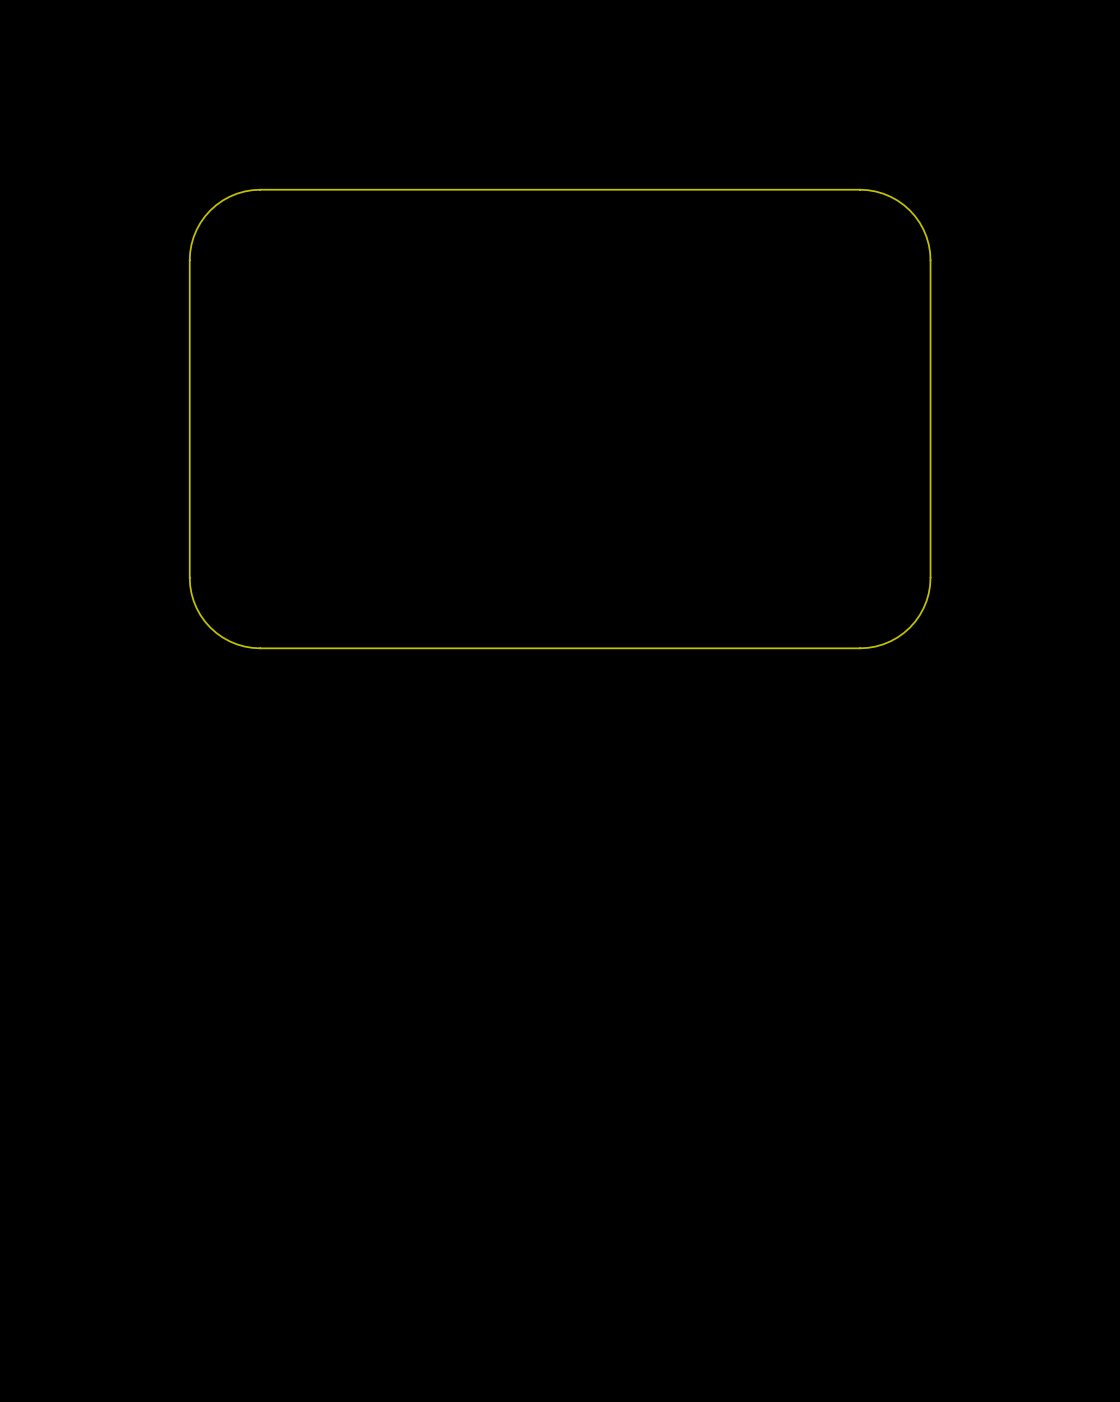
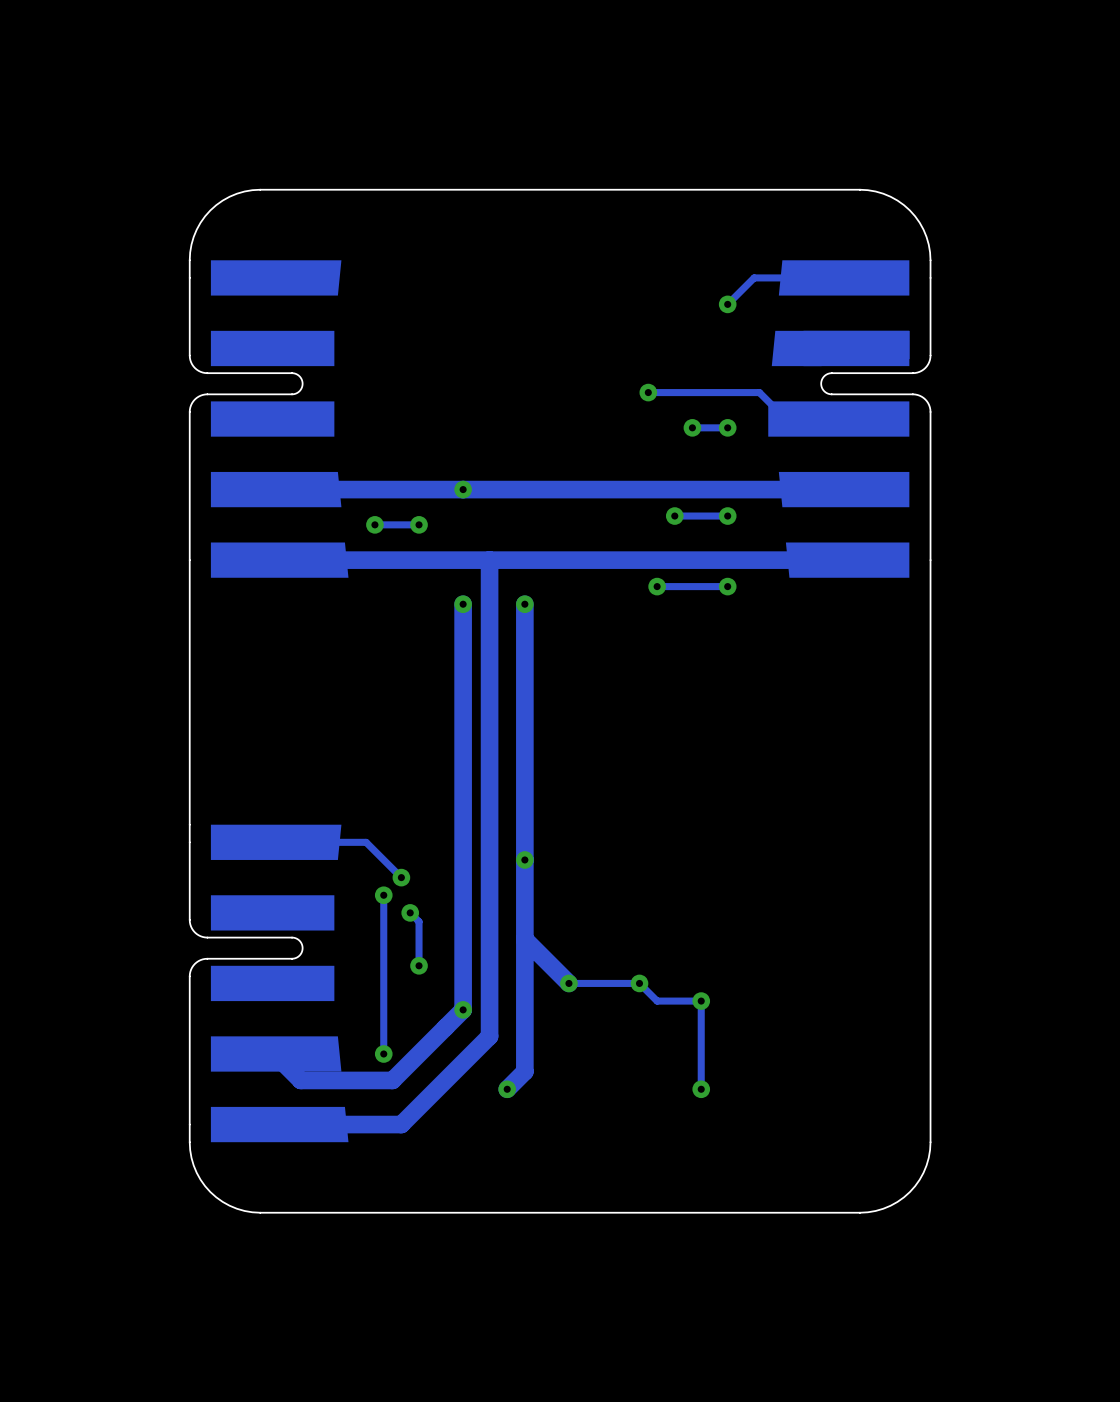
board edge: (189, 277) (189, 560) -> none
track: none -> (845, 277) (754, 277) (727, 304)
board edge: (930, 277) (930, 560) -> none
via: none -> (727, 304)
track: none -> (648, 392) (759, 392) (785, 419) (838, 419)
via: none -> (648, 392)
part: none -> (268, 419)
part: none -> (849, 419)
via: none -> (692, 427)
track: none -> (727, 427) (692, 427)
via: none -> (727, 427)
via: none -> (463, 489)
track: none -> (845, 489) (274, 489)
via: none -> (674, 516)
track: none -> (727, 516) (674, 516)
via: none -> (727, 516)
via: none -> (374, 524)
track: none -> (419, 524) (374, 524)
via: none -> (419, 524)
track: none -> (489, 560) (489, 1036) (401, 1124) (277, 1124)
track: none -> (849, 560) (277, 560)
board edge: none -> (189, 577) (189, 842)
board edge: (930, 577) (928, 593) (923, 608) (909, 627) (897, 637) (883, 644) (859, 648) (252, 647) (229, 641) (216, 632) (205, 621) (193, 601) (189, 577) -> (930, 577) (930, 1142) (928, 1157) (923, 1172) (915, 1186) (903, 1197) (883, 1208) (859, 1212) (252, 1212) (229, 1205) (216, 1197) (205, 1186) (196, 1172) (191, 1157) (189, 1124)
via: none -> (657, 586)
track: none -> (727, 586) (657, 586)
via: none -> (727, 586)
track: none -> (463, 604) (463, 1009) (392, 1080) (300, 1080) (274, 1053)
via: none -> (463, 604)
track: none -> (524, 604) (524, 1071) (507, 1089)
via: none -> (524, 604)
track: none -> (274, 842) (366, 842) (401, 877)
via: none -> (524, 859)
via: none -> (401, 877)
track: none -> (383, 895) (383, 1053)
via: none -> (383, 895)
track: none -> (410, 912) (419, 921) (419, 965)
via: none -> (410, 912)
track: none -> (524, 939) (568, 983) (639, 983) (657, 1001) (701, 1001) (701, 1089)
via: none -> (419, 965)
part: none -> (268, 983)
via: none -> (568, 983)
via: none -> (639, 983)
via: none -> (701, 1001)
via: none -> (463, 1009)
via: none -> (383, 1053)
via: none -> (507, 1089)
via: none -> (701, 1089)

